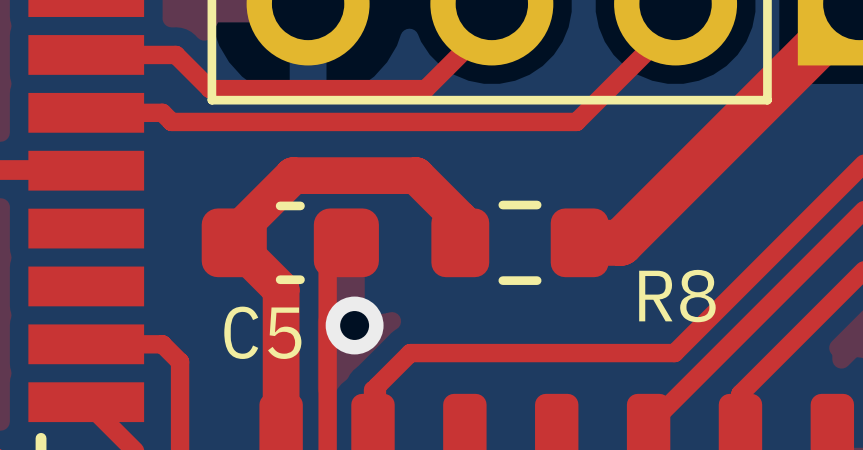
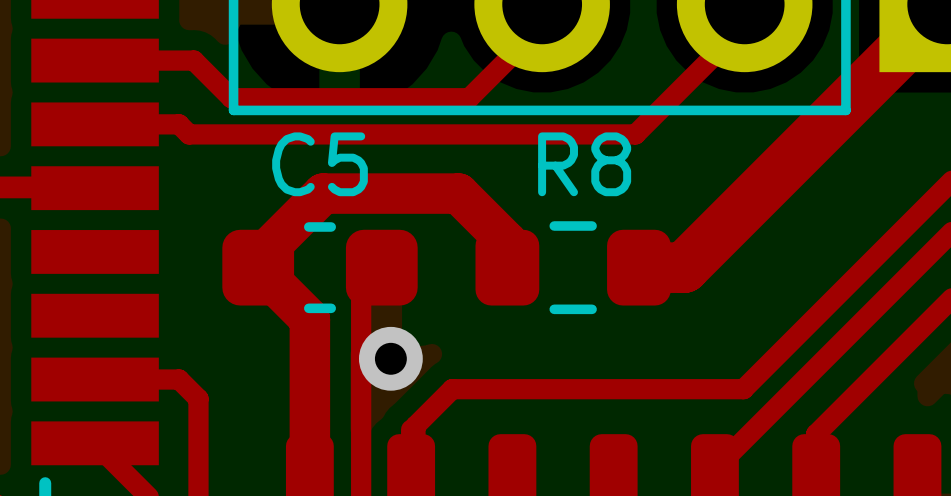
R8 name position: R8 (677, 296) -> R8 (584, 164)
C5 name position: C5 (262, 332) -> C5 (320, 164)

